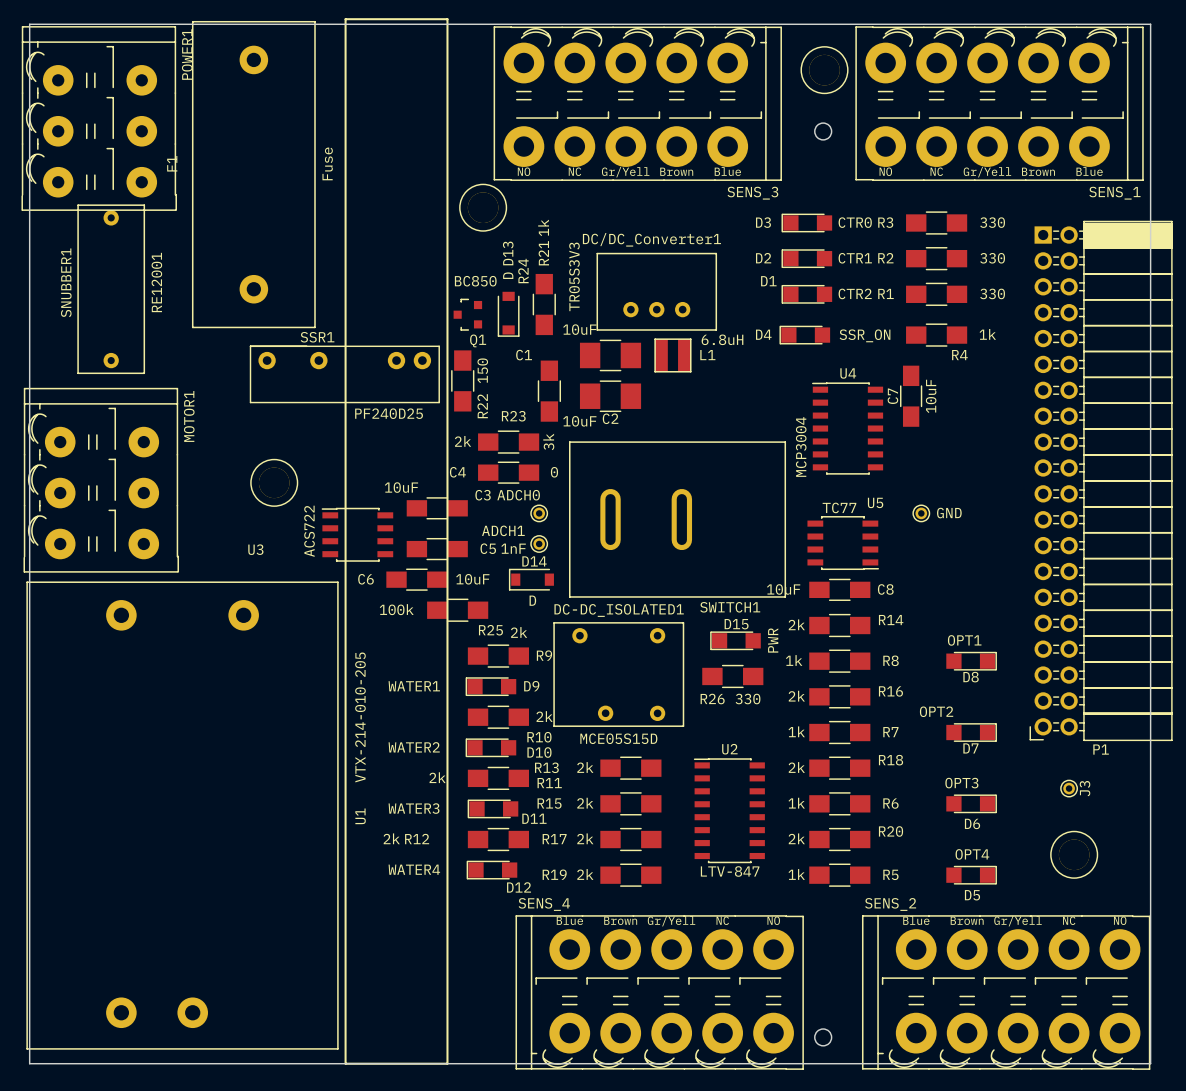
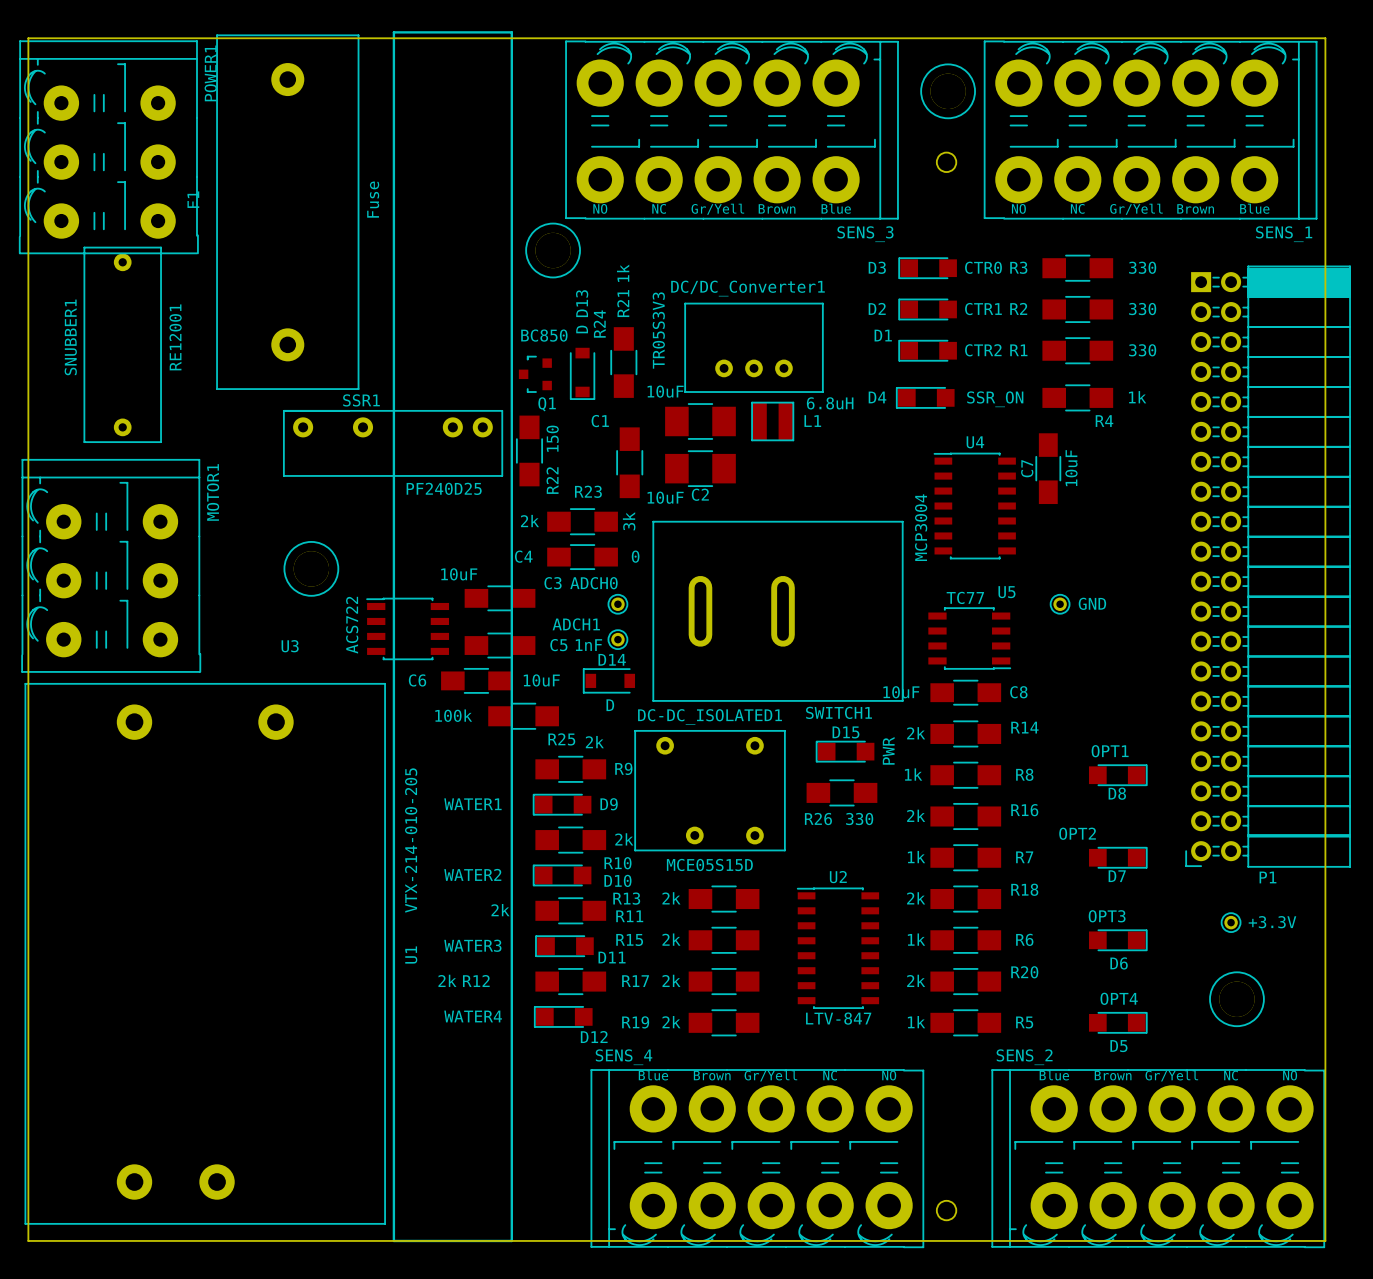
J3 name: J3 (1085, 788) -> +3.3V (1272, 922)

